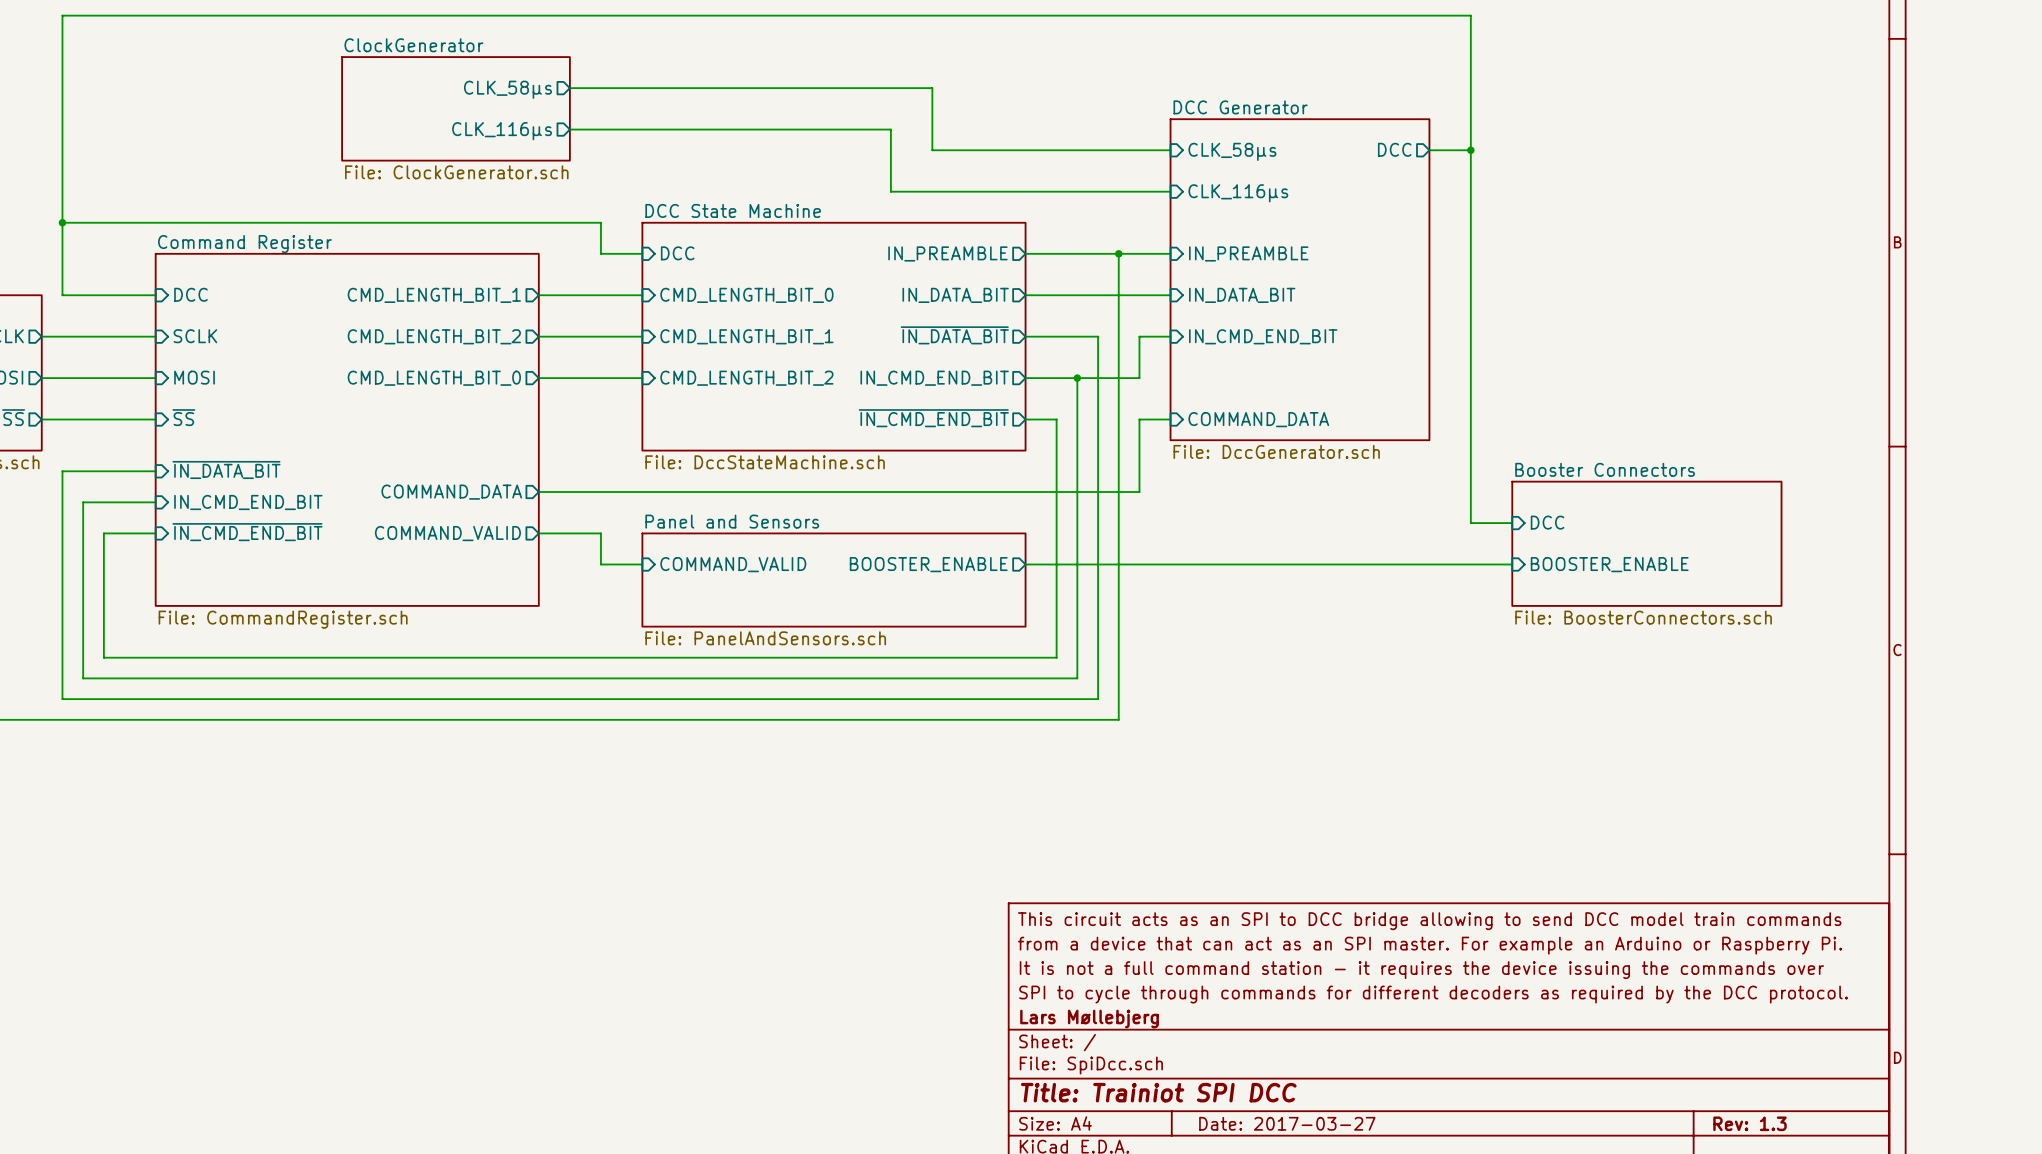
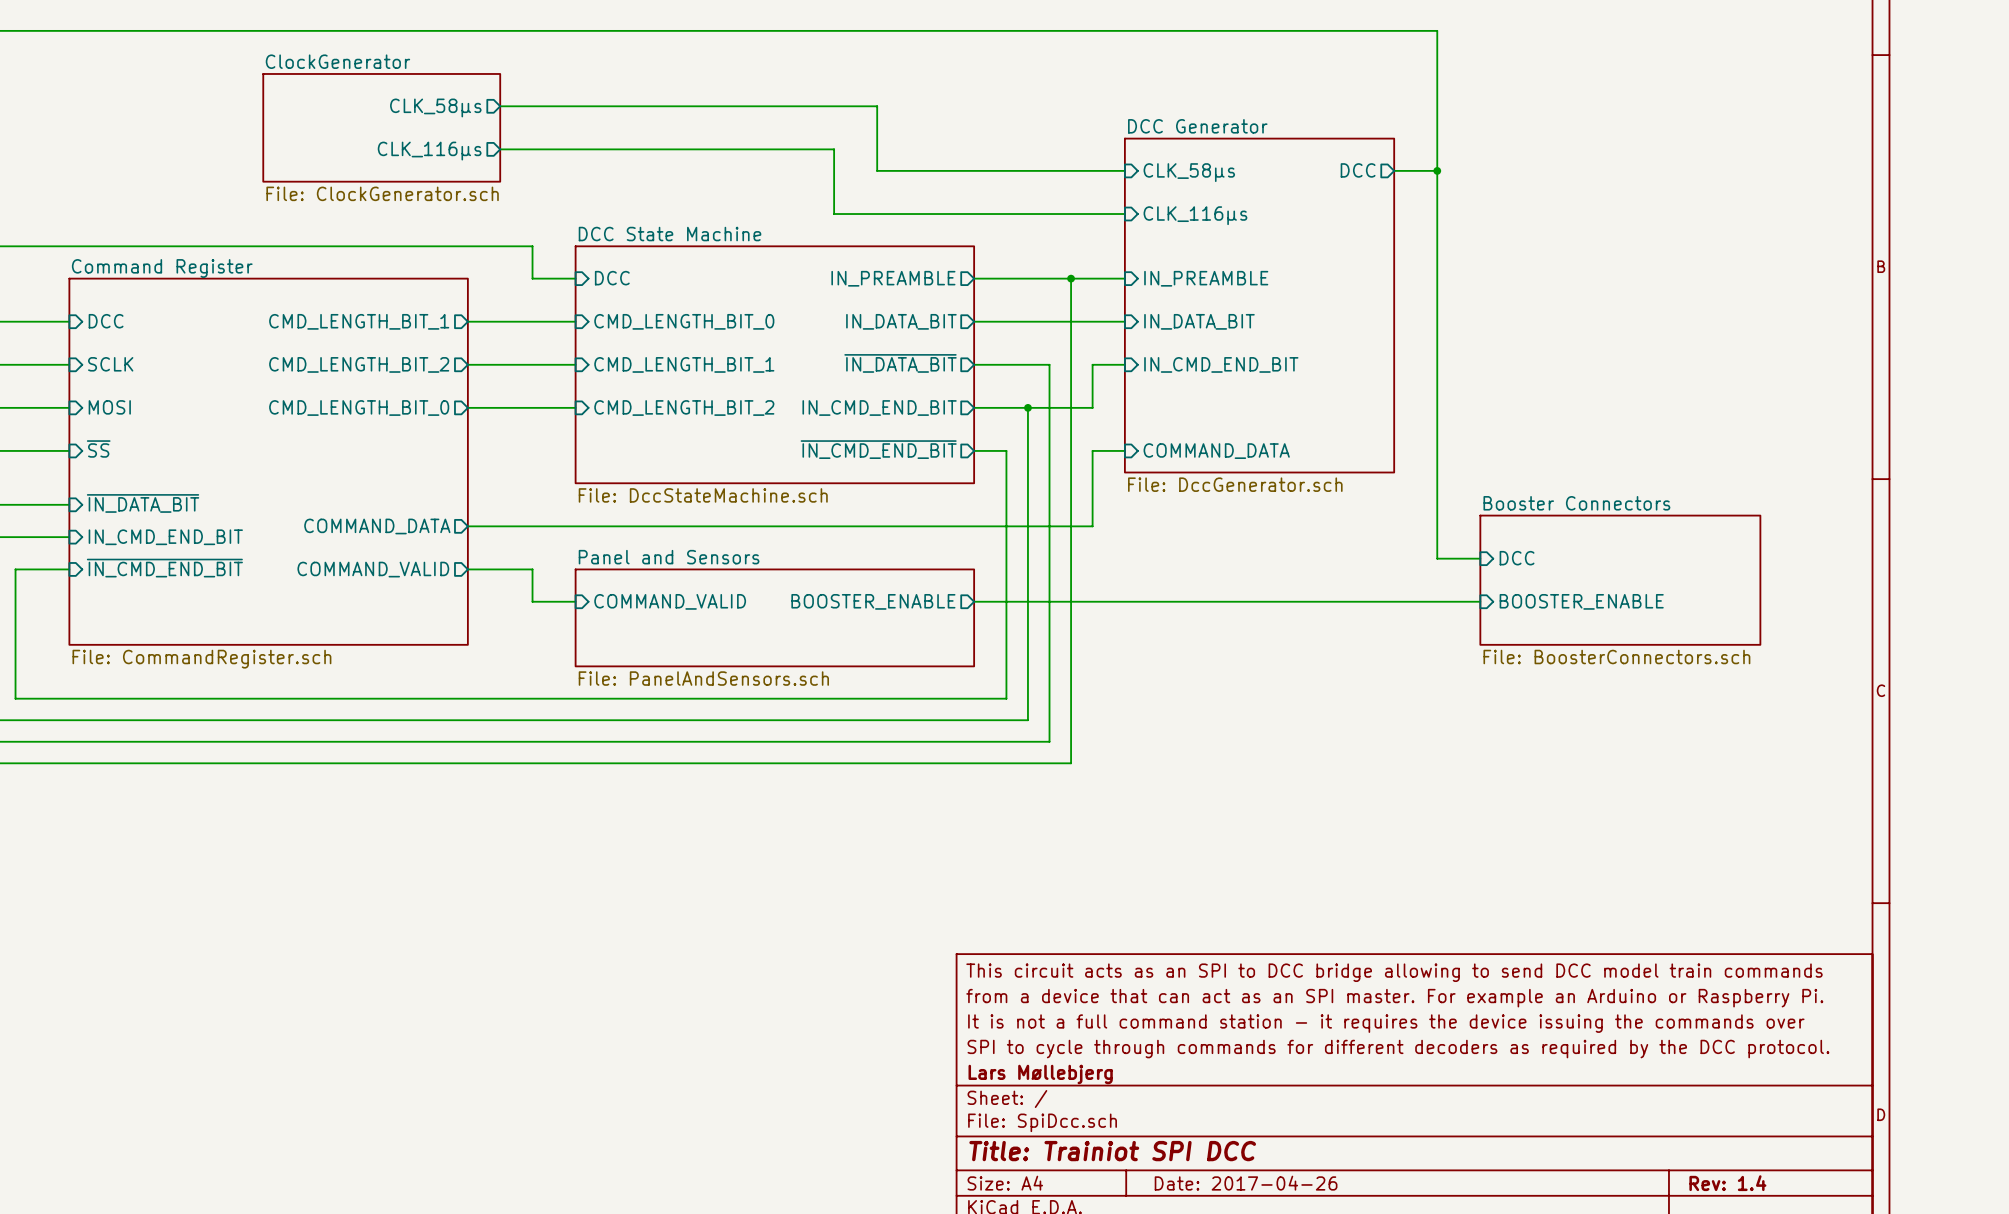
title block: Date: 2017-03-27 (1287, 1123) -> Date: 2017-04-26 (1246, 1183)
title block: Rev: 1.3 (1749, 1123) -> Rev: 1.4 (1727, 1183)

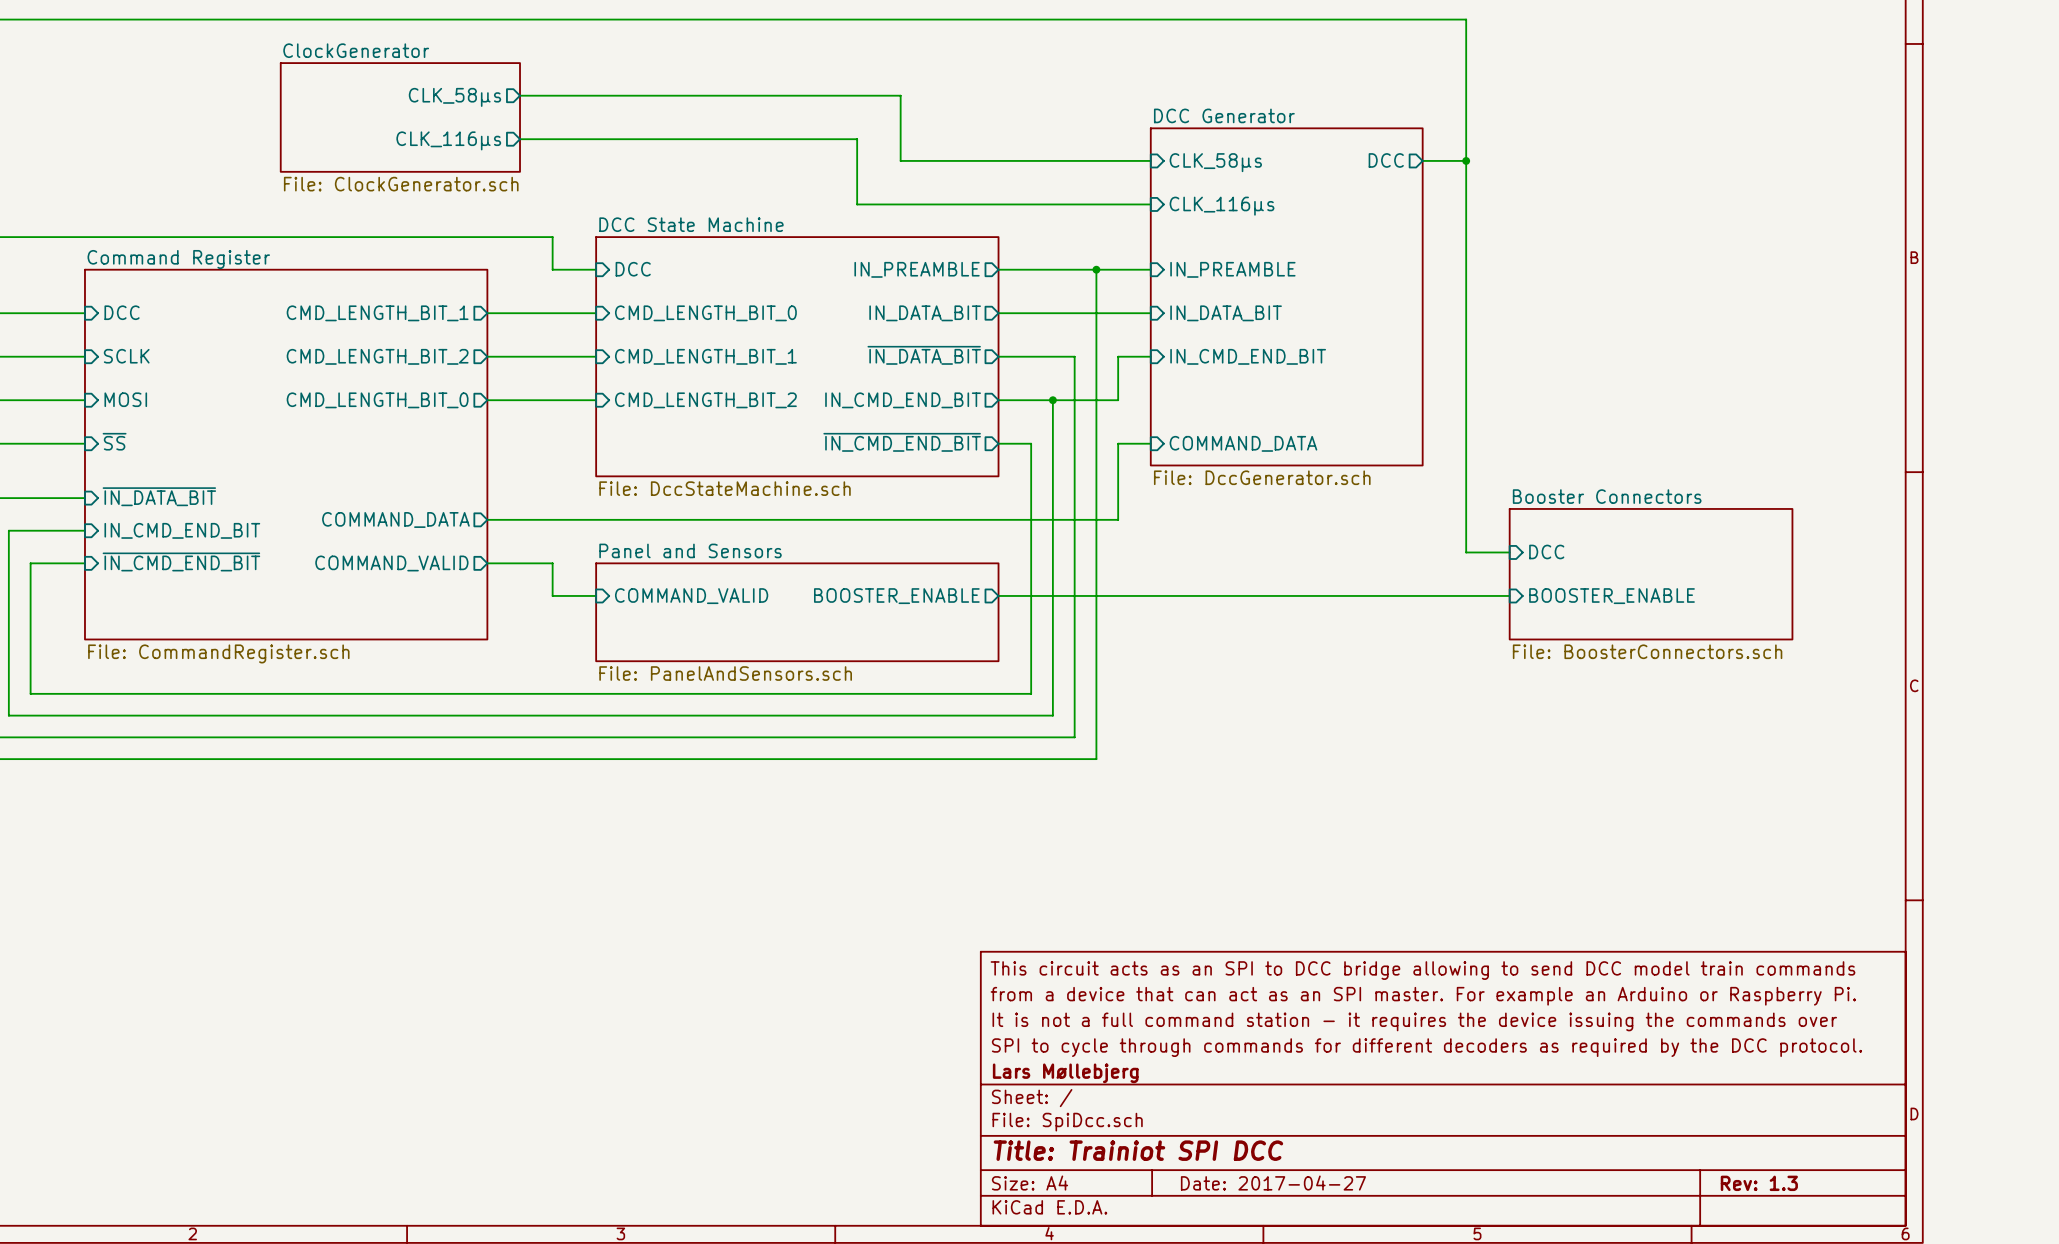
title block: Date: 2017-04-26 (1246, 1183) -> Date: 2017-04-27 (1273, 1183)
title block: Rev: 1.4 (1727, 1183) -> Rev: 1.3 (1759, 1183)

